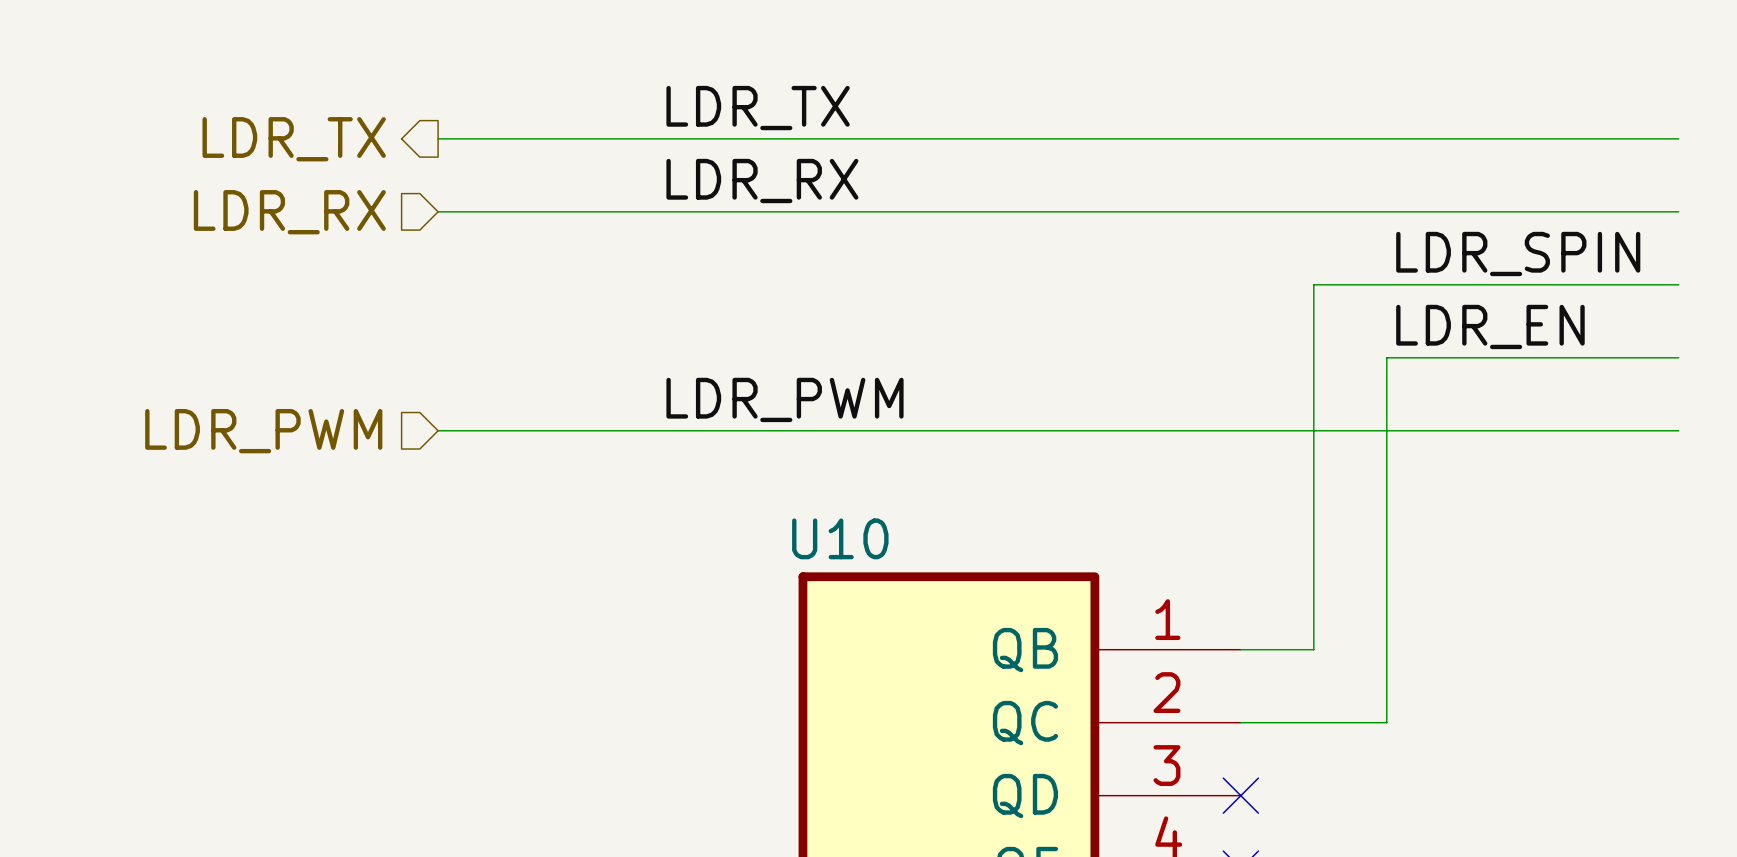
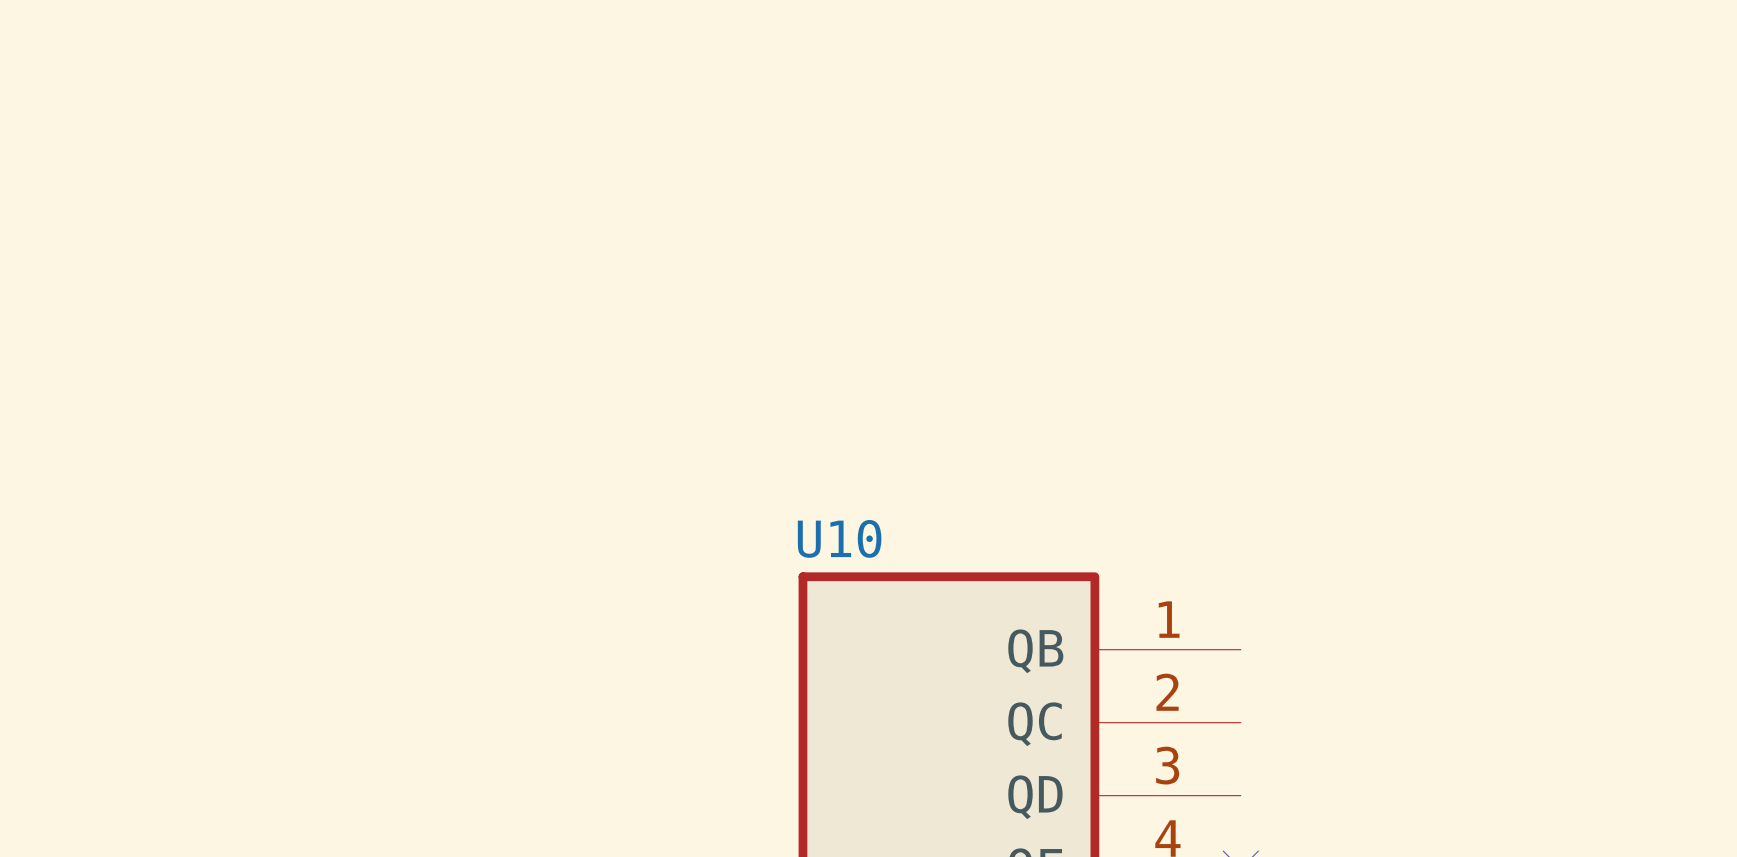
label: LDR_TX (758, 108) -> none
wire: (438, 138) (1678, 138) -> none
hierarchical label: LDR_TX (294, 139) -> none
label: LDR_RX (762, 181) -> none
wire: (438, 211) (1678, 211) -> none
hierarchical label: LDR_RX (289, 212) -> none
label: LDR_SPIN (1518, 253) -> none
wire: (1678, 284) (1313, 284) (1313, 649) (1240, 649) -> none
label: LDR_EN (1490, 326) -> none
wire: (1678, 357) (1386, 357) (1386, 722) (1240, 722) -> none
label: LDR_PWM (785, 399) -> none
wire: (438, 430) (1678, 430) -> none
hierarchical label: LDR_PWM (263, 431) -> none
no-connect mark: (1240, 795) -> none

